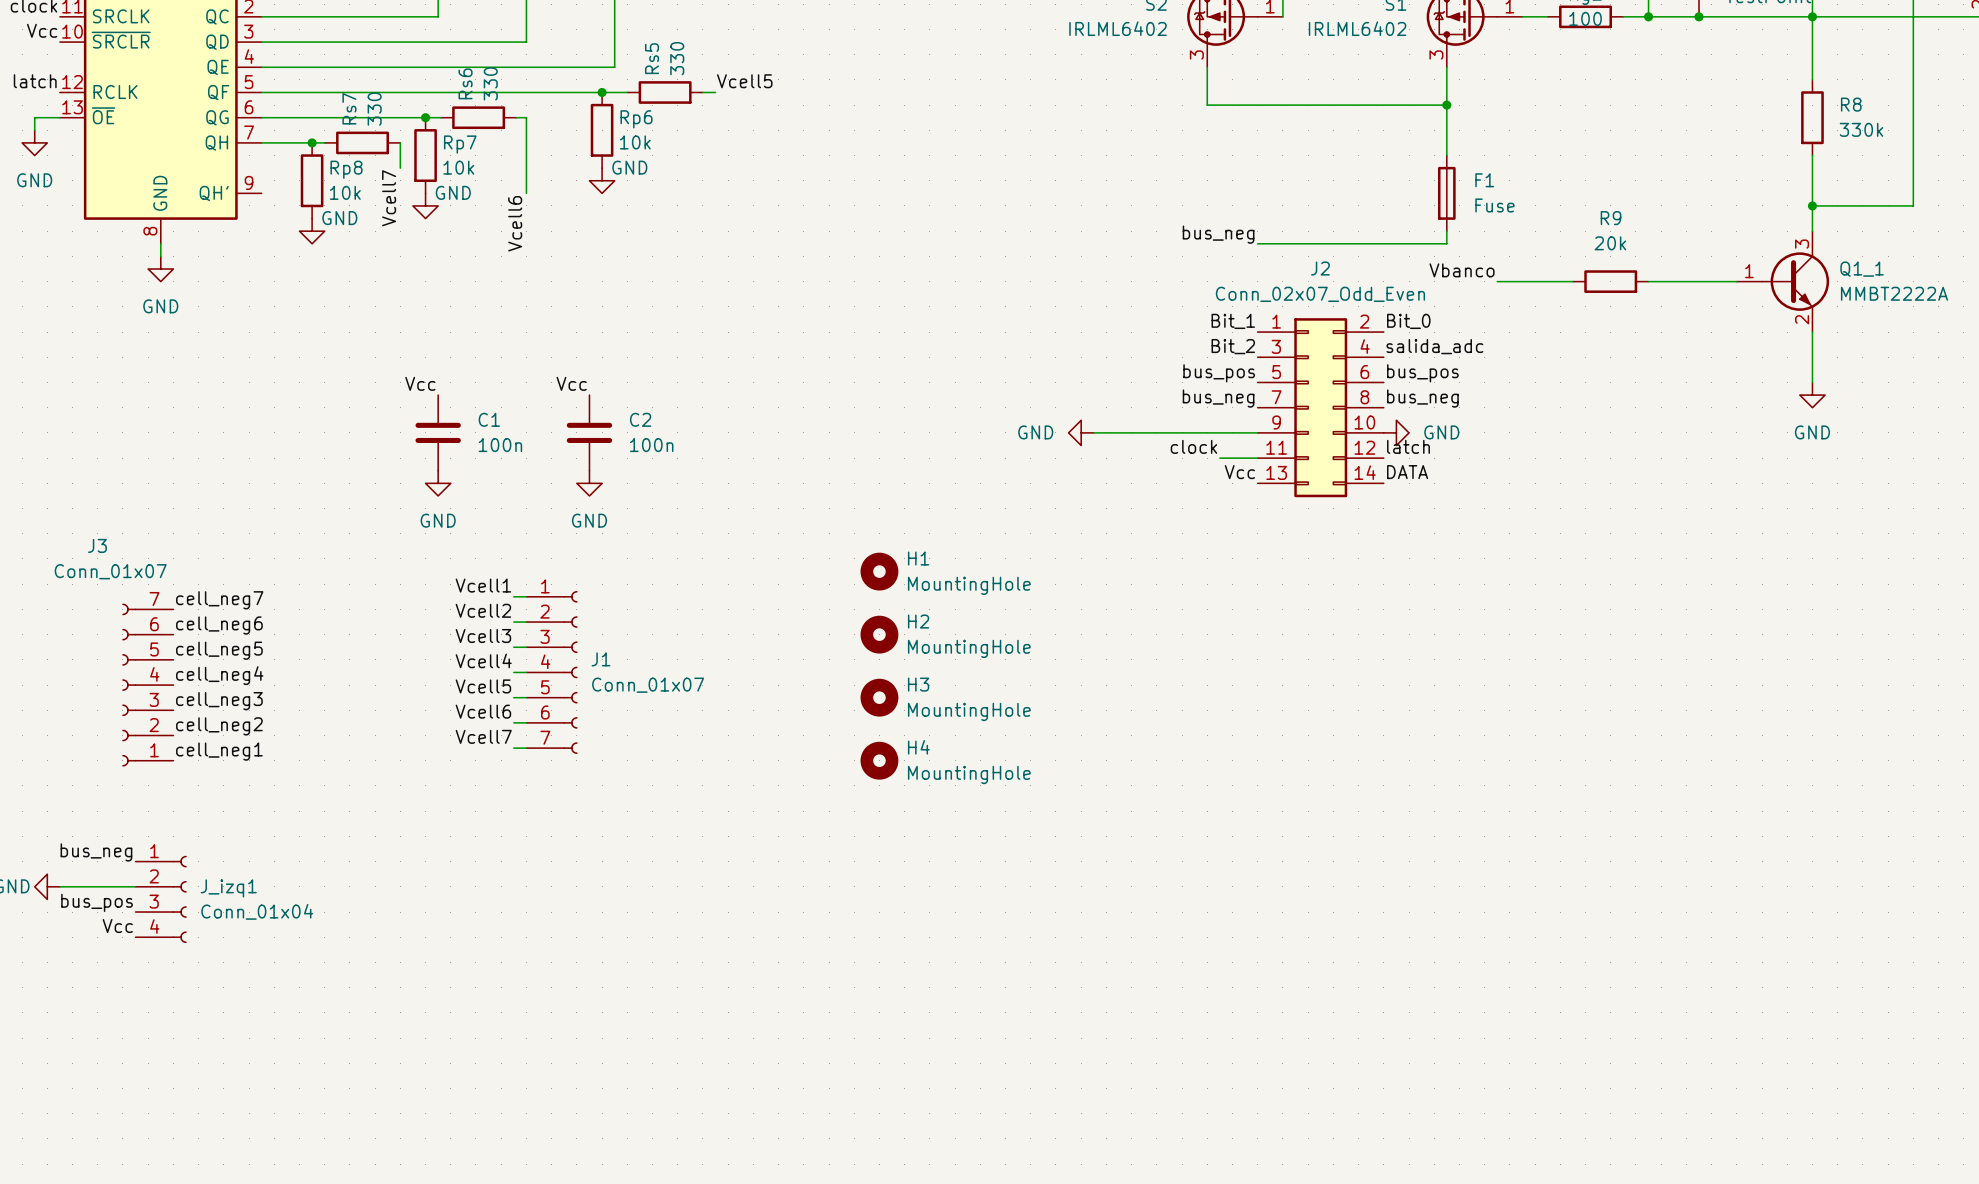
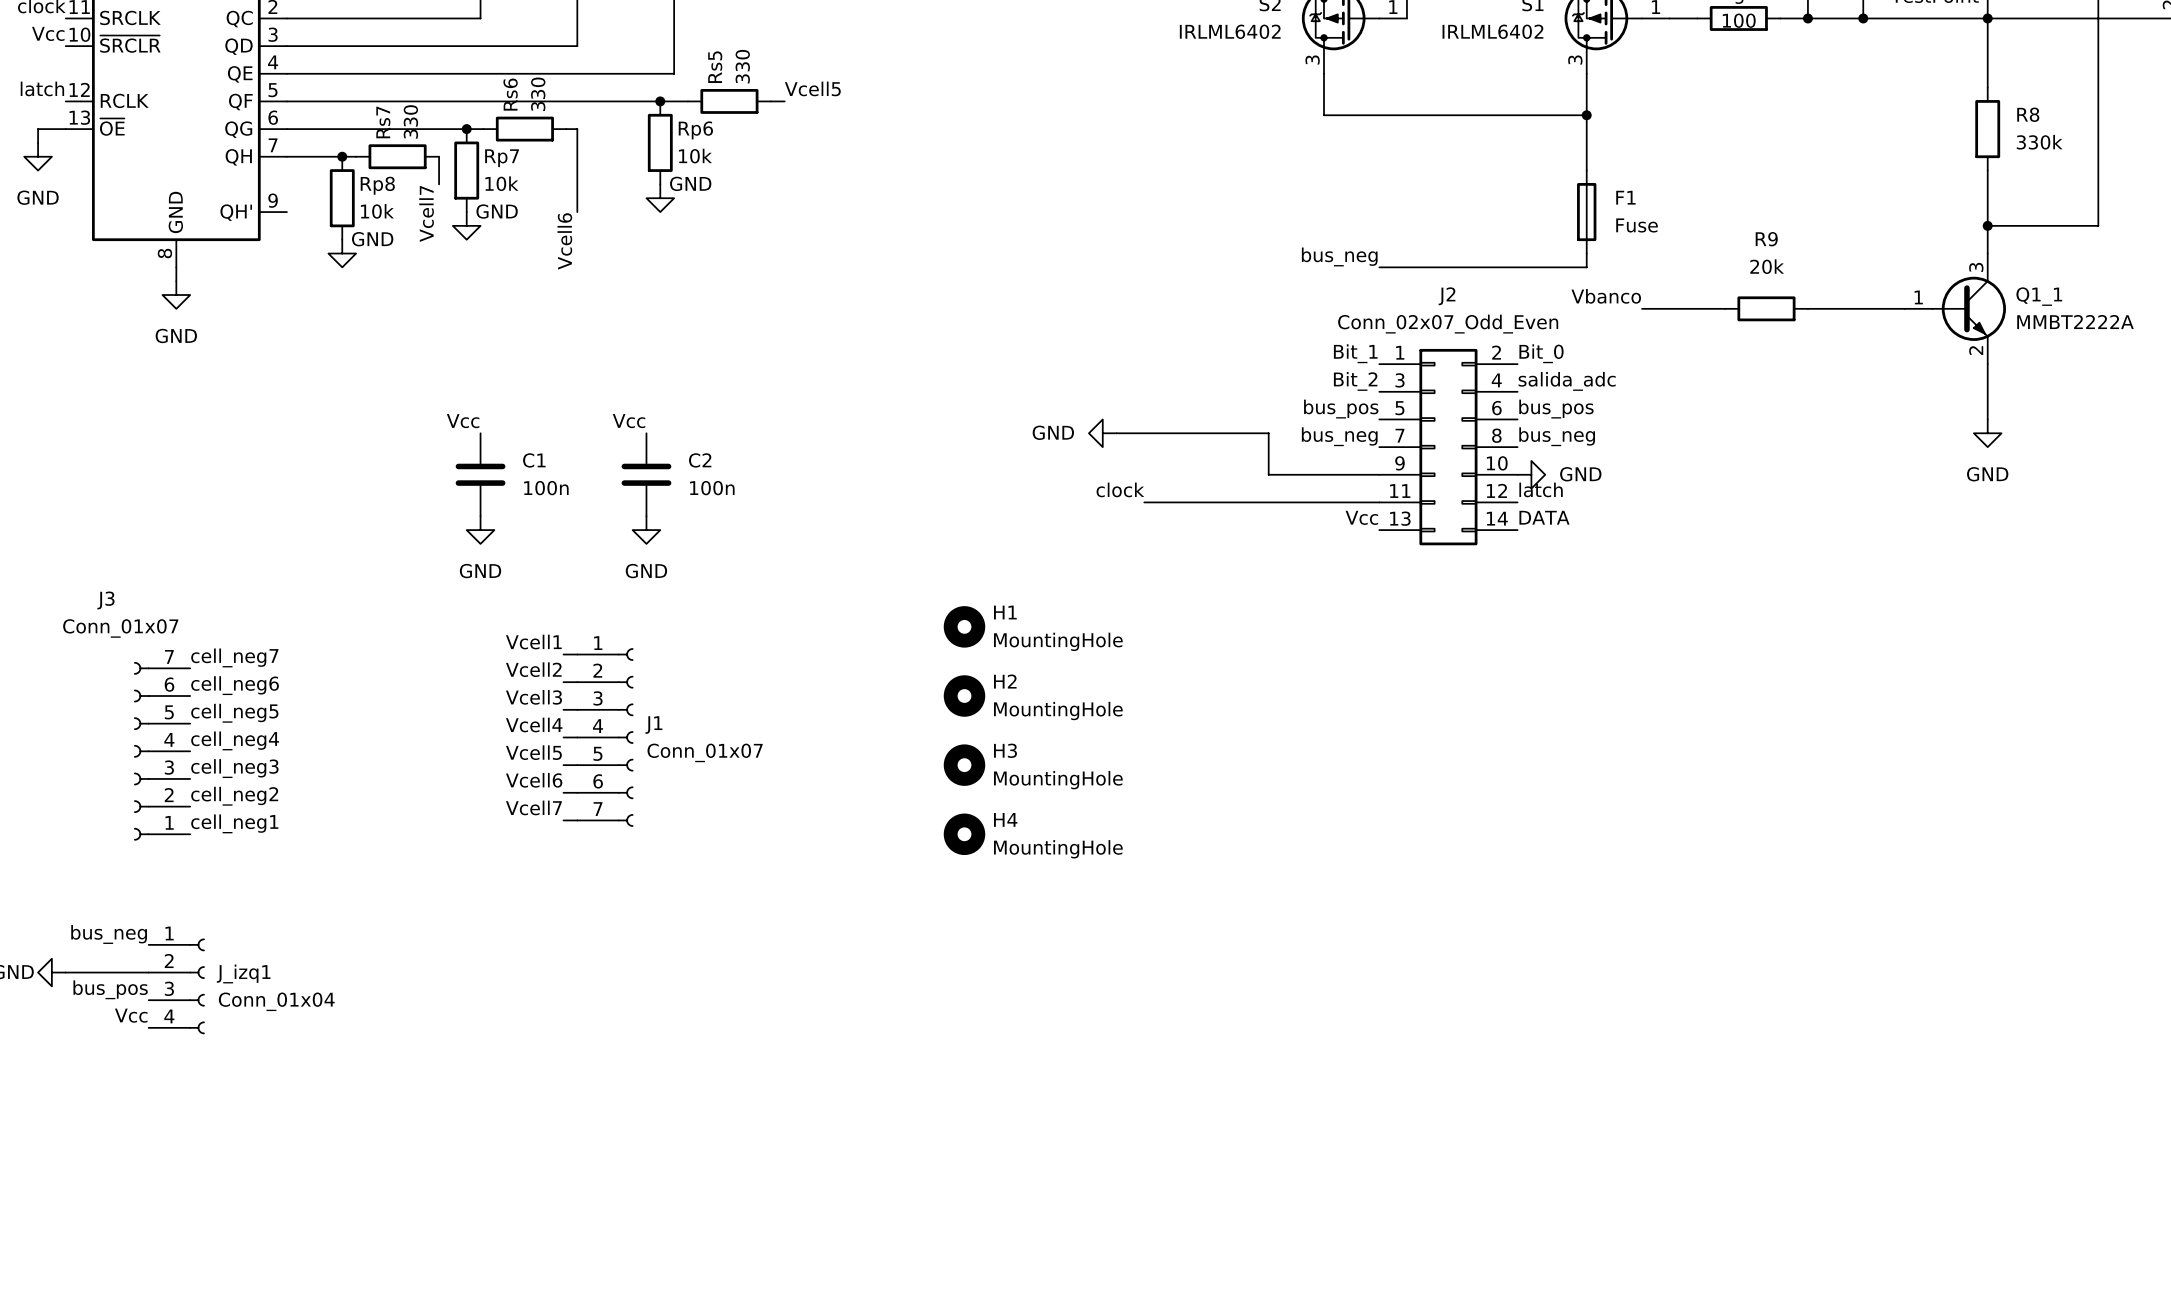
power symbol position: GND (1081, 432) -> GND (1102, 433)
wire: (1093, 432) (1156, 432) -> (1116, 433) (1268, 433) (1268, 474)
label position: clock (1193, 446) -> clock (1120, 489)
wire: none -> (1144, 502) (1337, 502)

